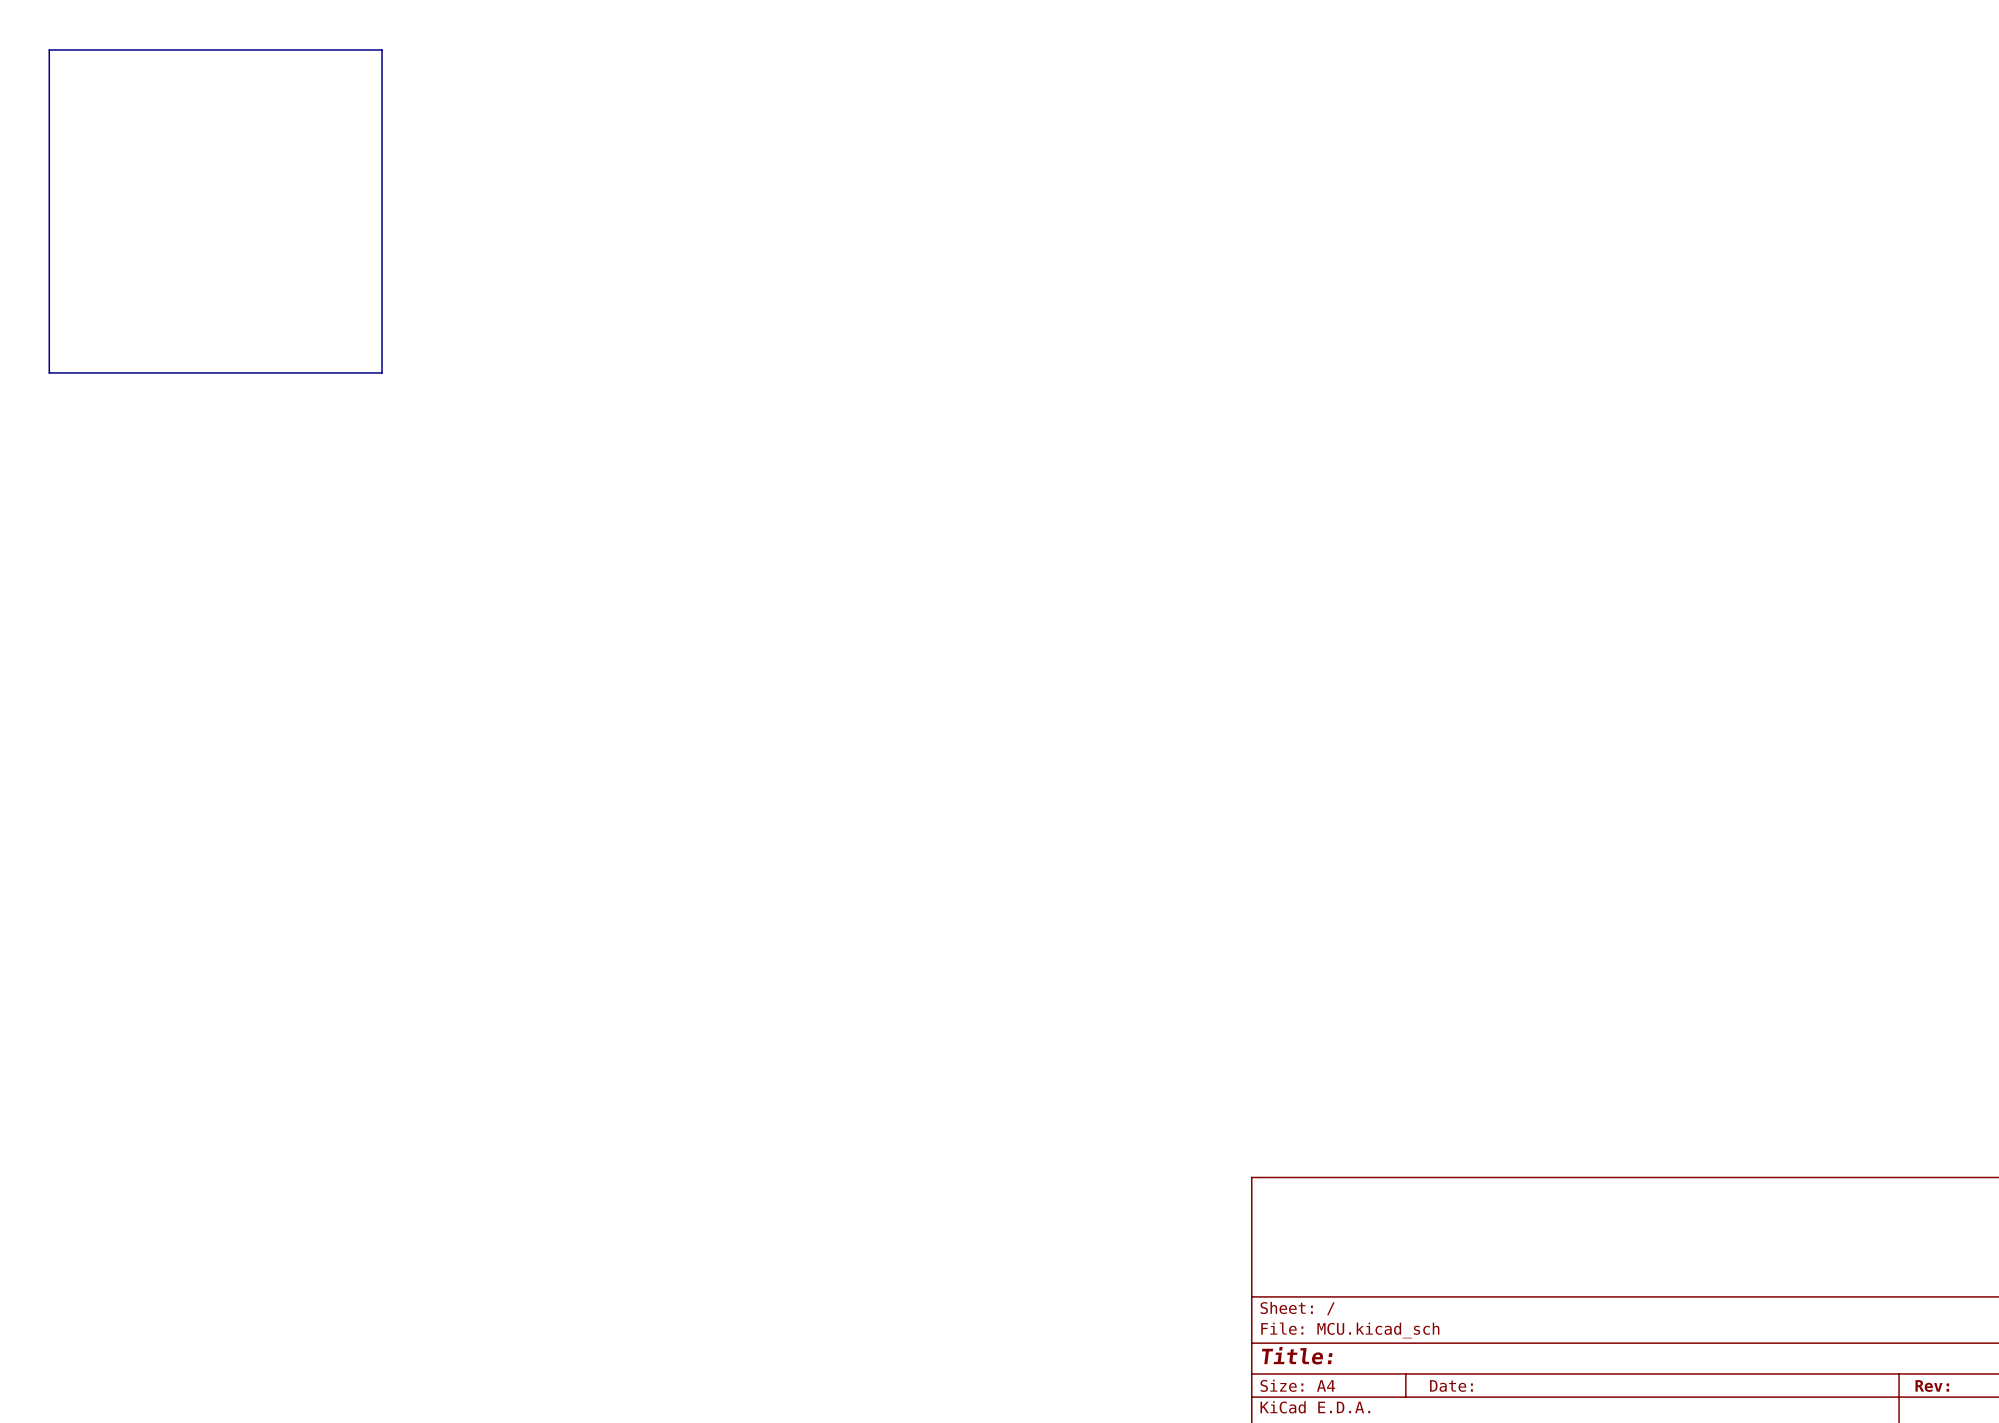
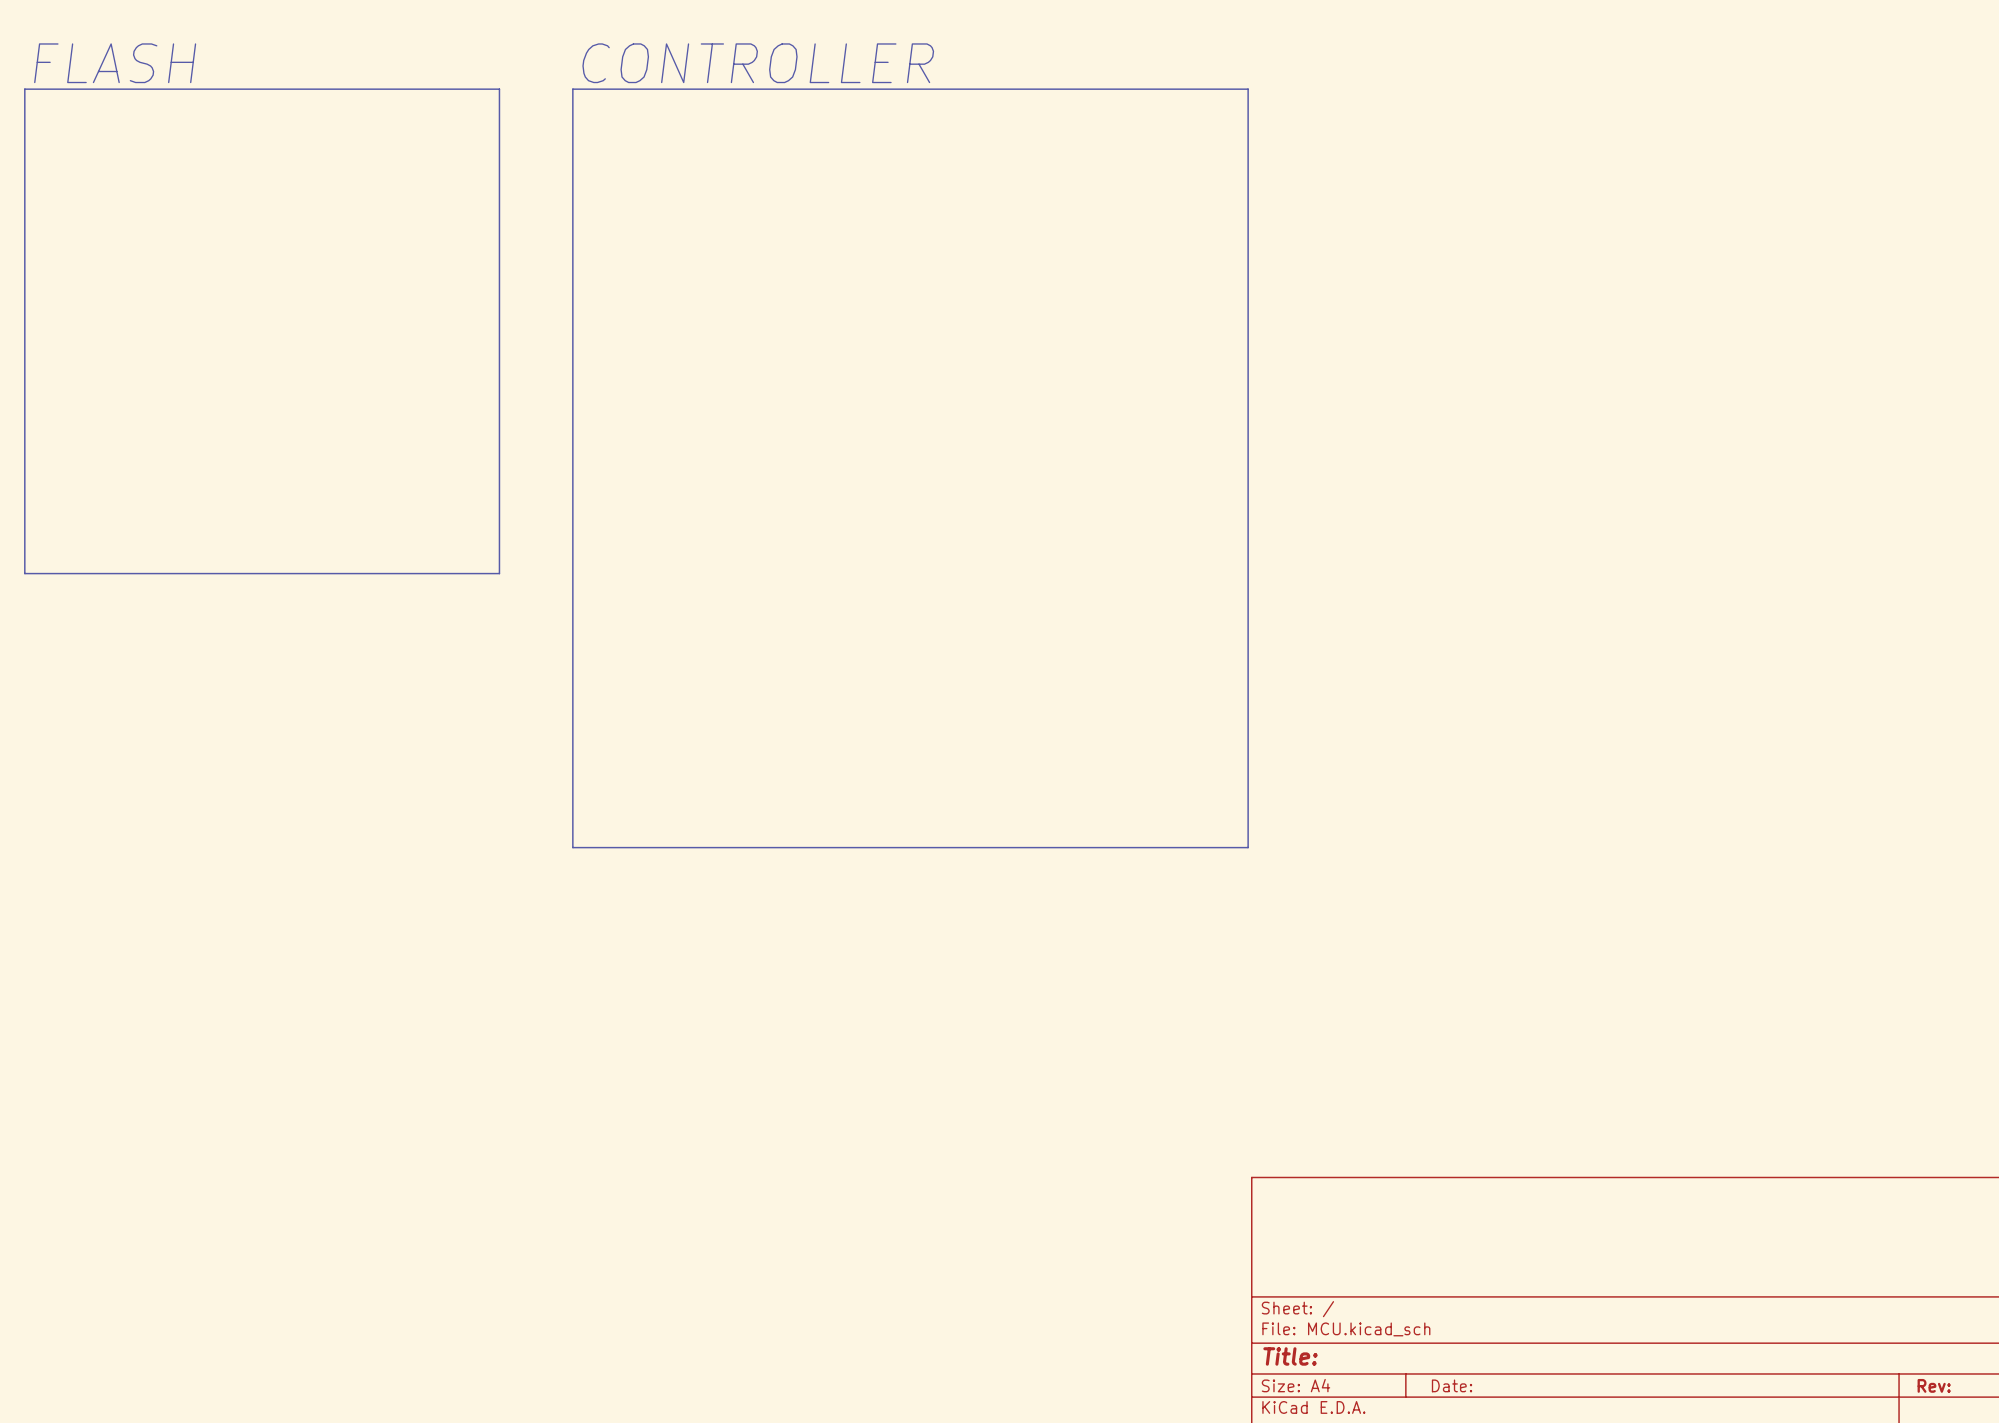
line: (49, 50) (49, 372) (382, 372) (382, 50) (49, 50) -> none
text: none -> FLASH (115, 63)
text: none -> CONTROLLER (758, 63)
line: none -> (24, 89) (499, 89) (499, 573) (24, 573) (24, 89)
line: none -> (572, 89) (1248, 89) (1248, 847) (572, 847) (572, 89)

